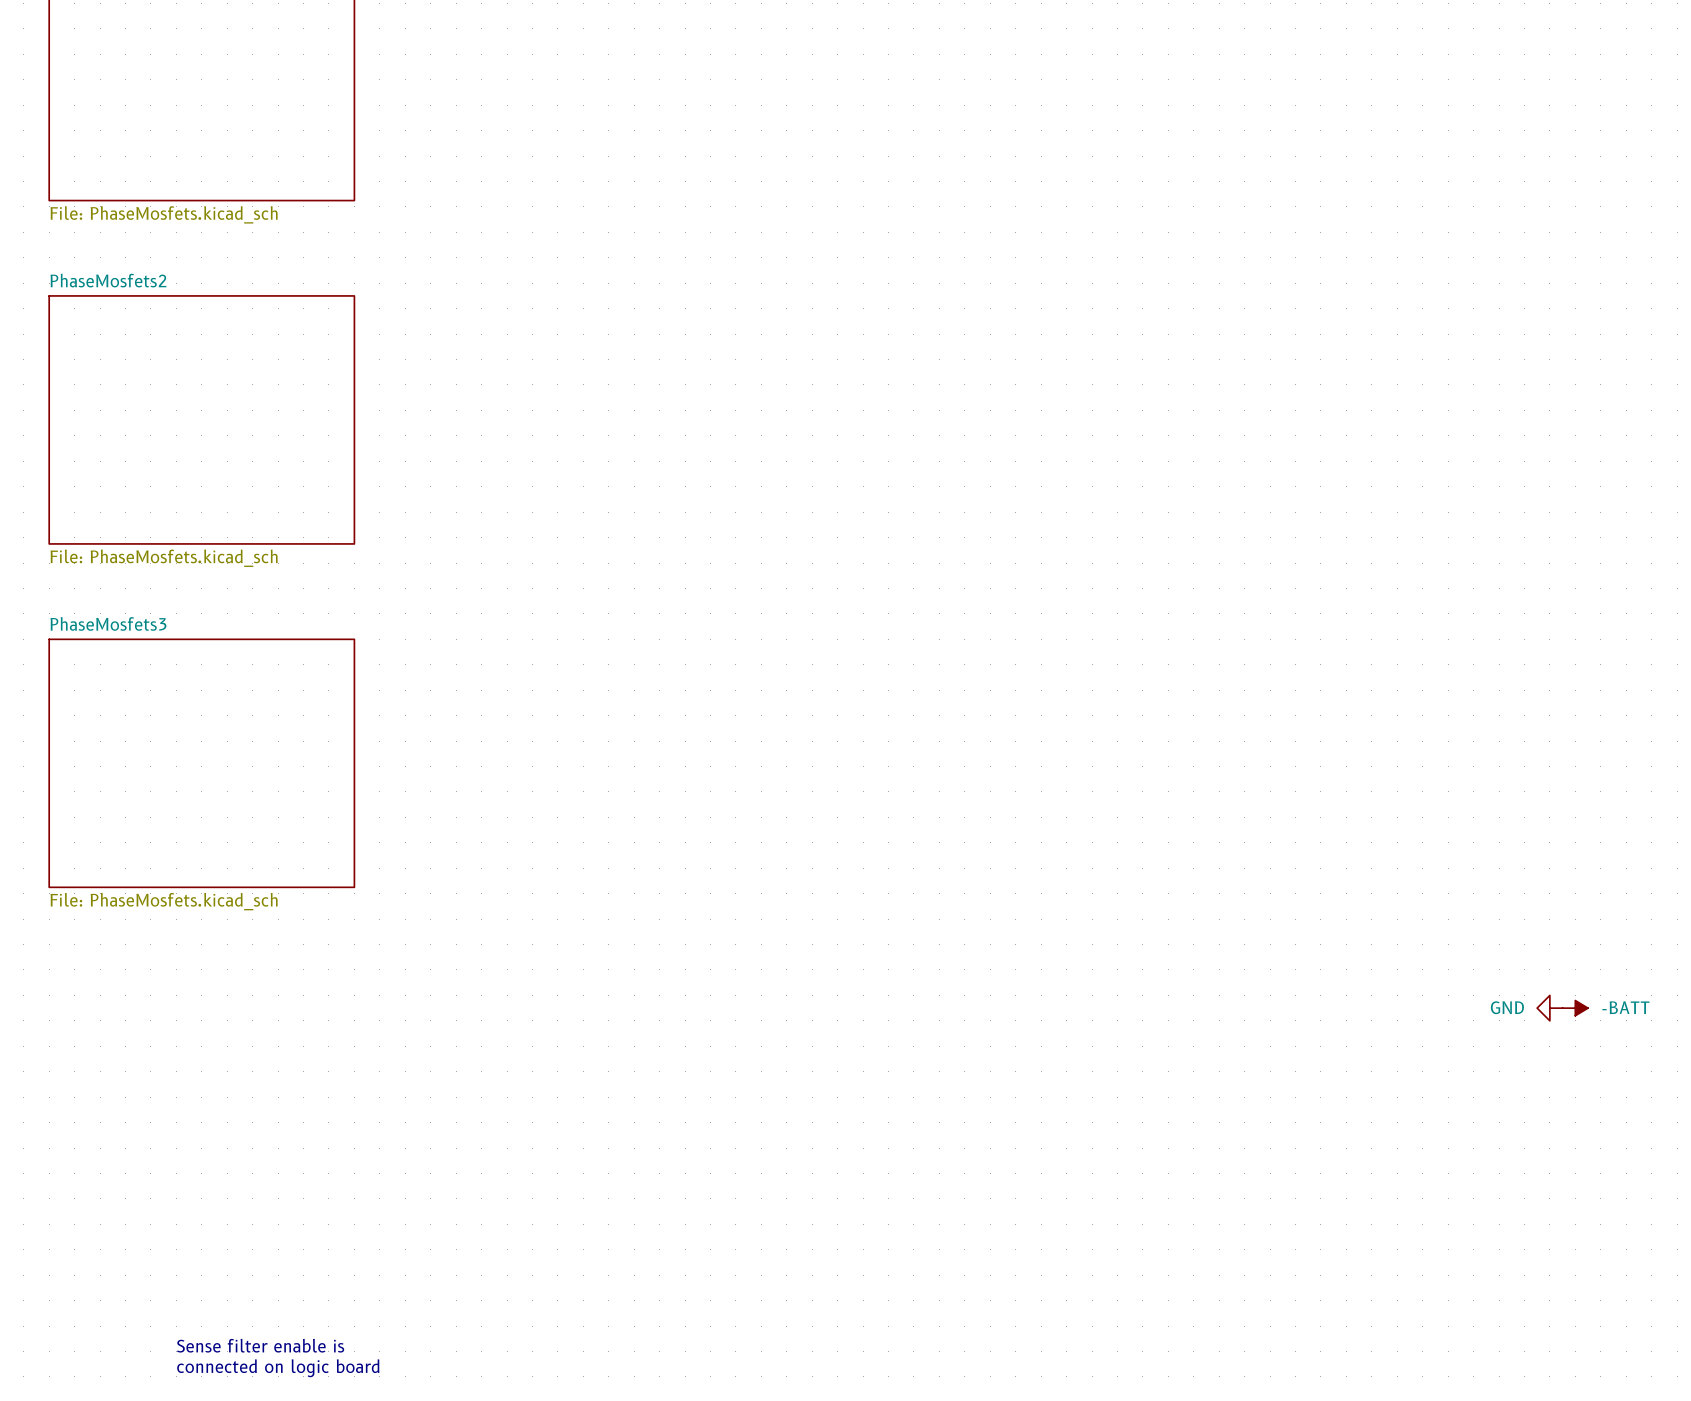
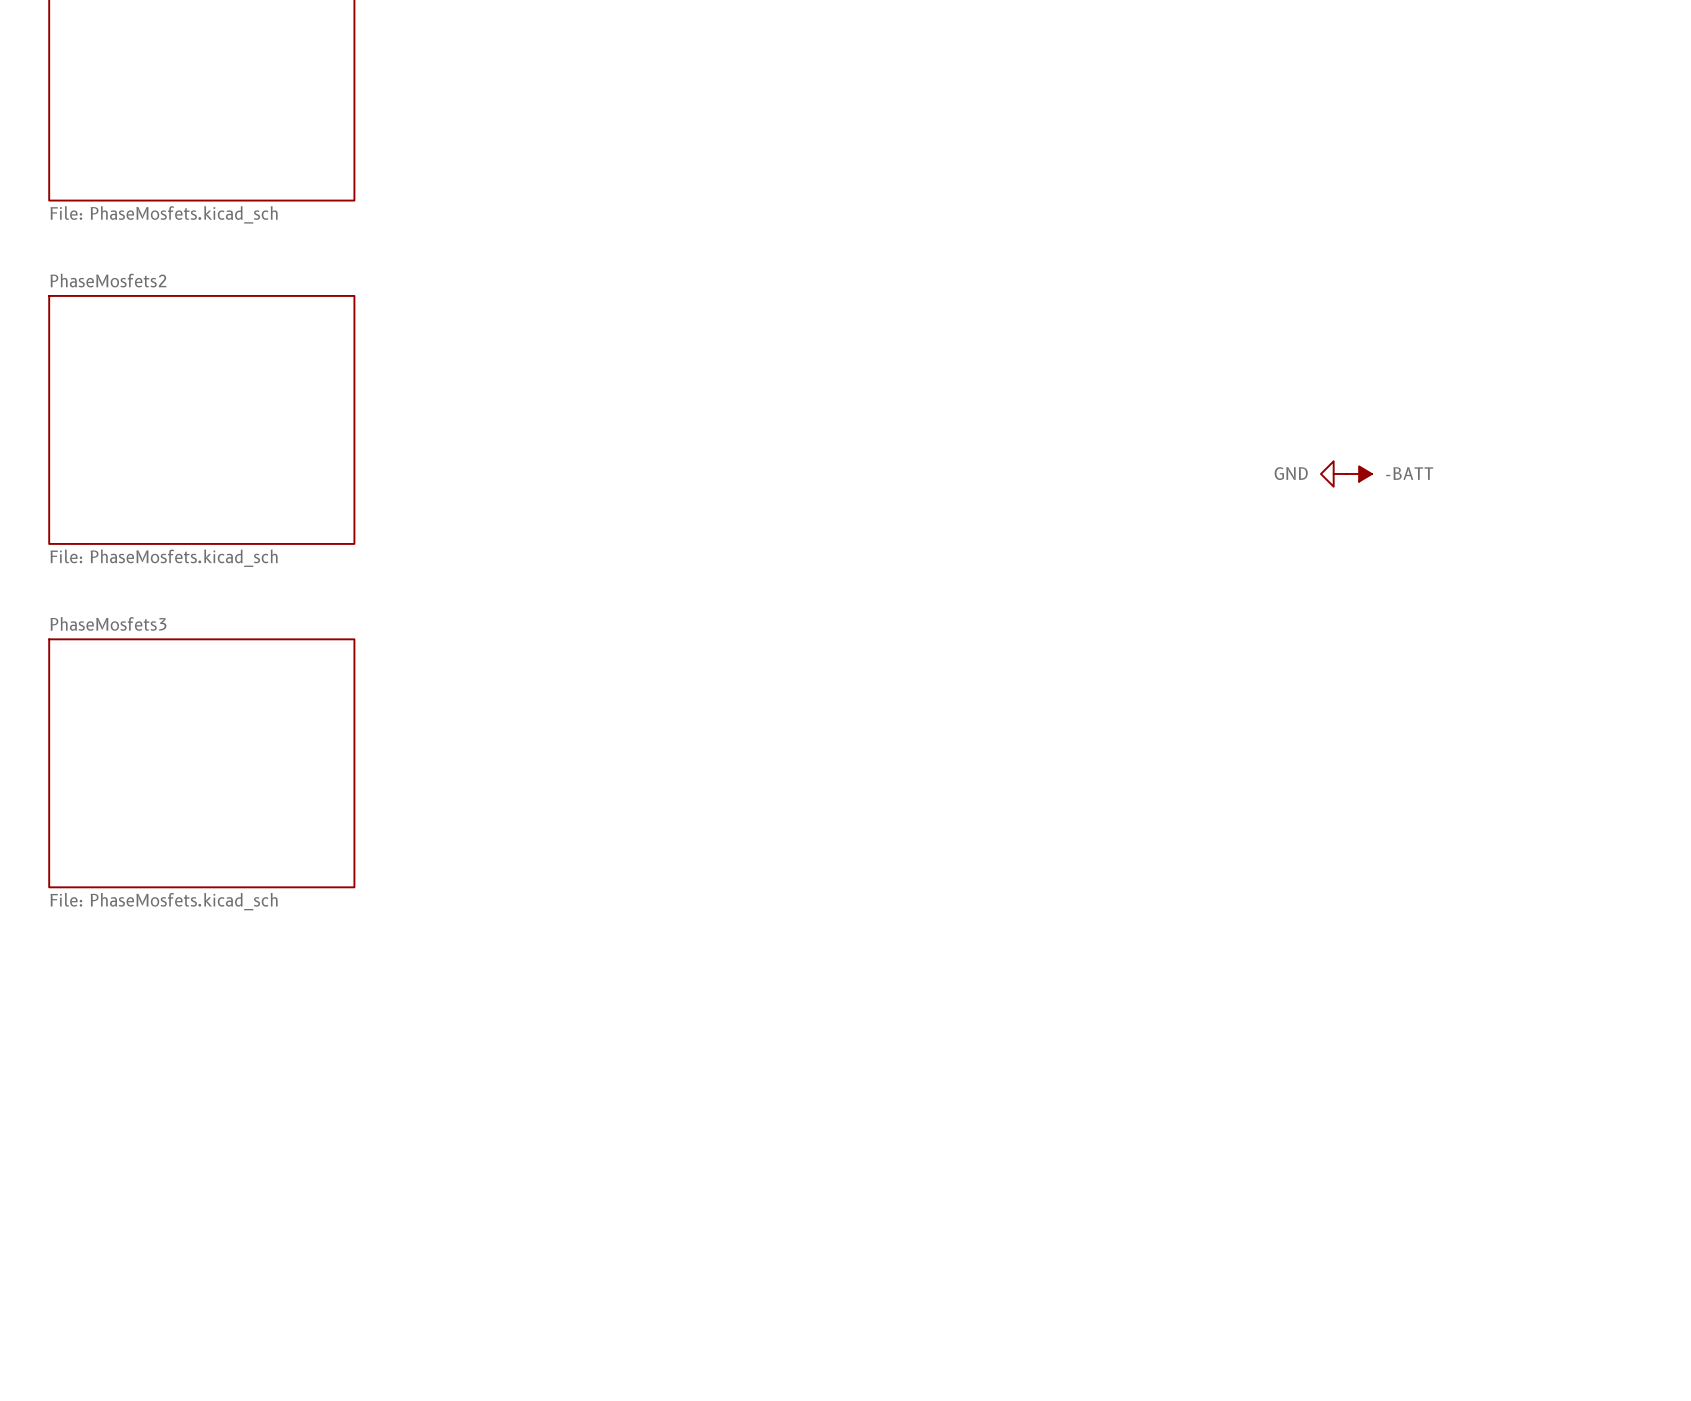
power symbol: none -> GND (1333, 473)
power symbol: none -> -BATT (1359, 473)
power symbol: GND (1549, 1008) -> none
power symbol: -BATT (1575, 1008) -> none
text: Sense filter enable is (260, 1345) -> none
text: connected on logic board (278, 1368) -> none

